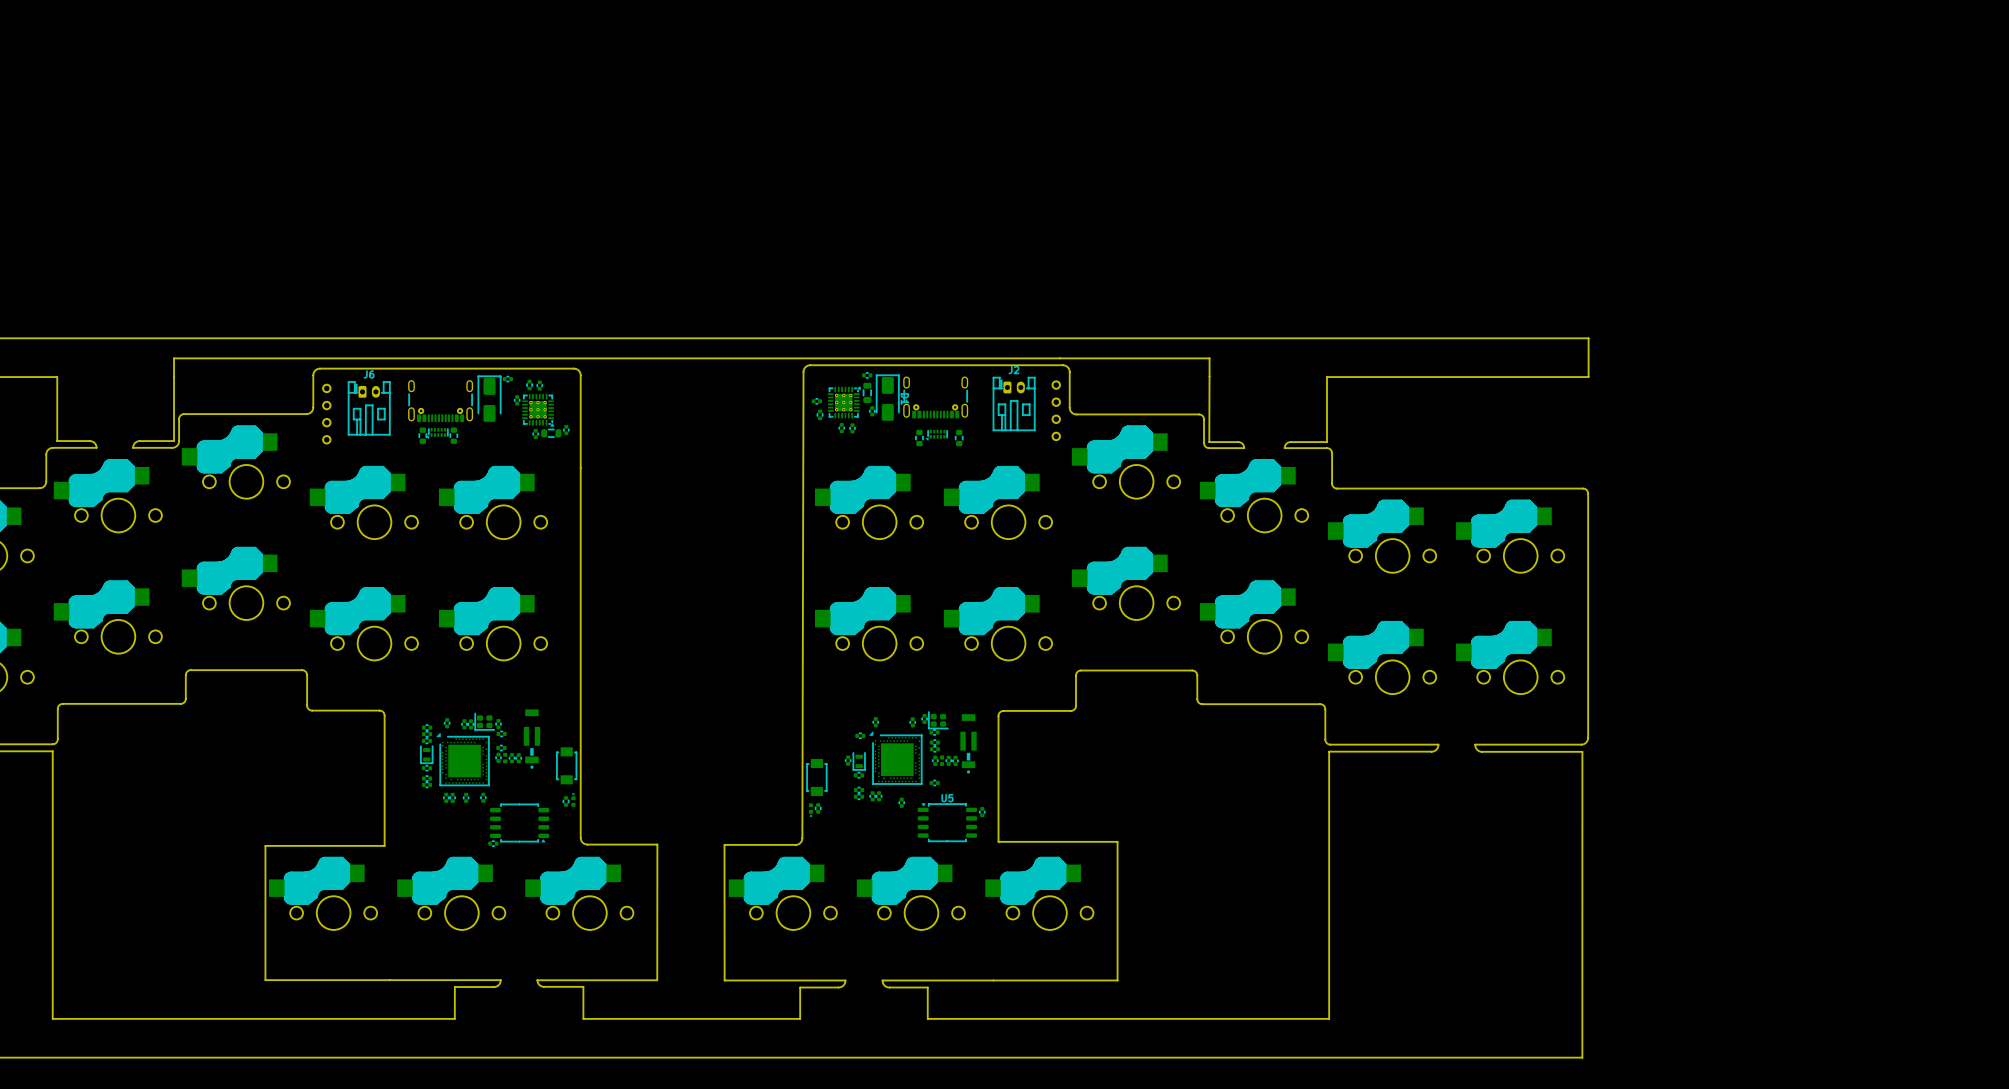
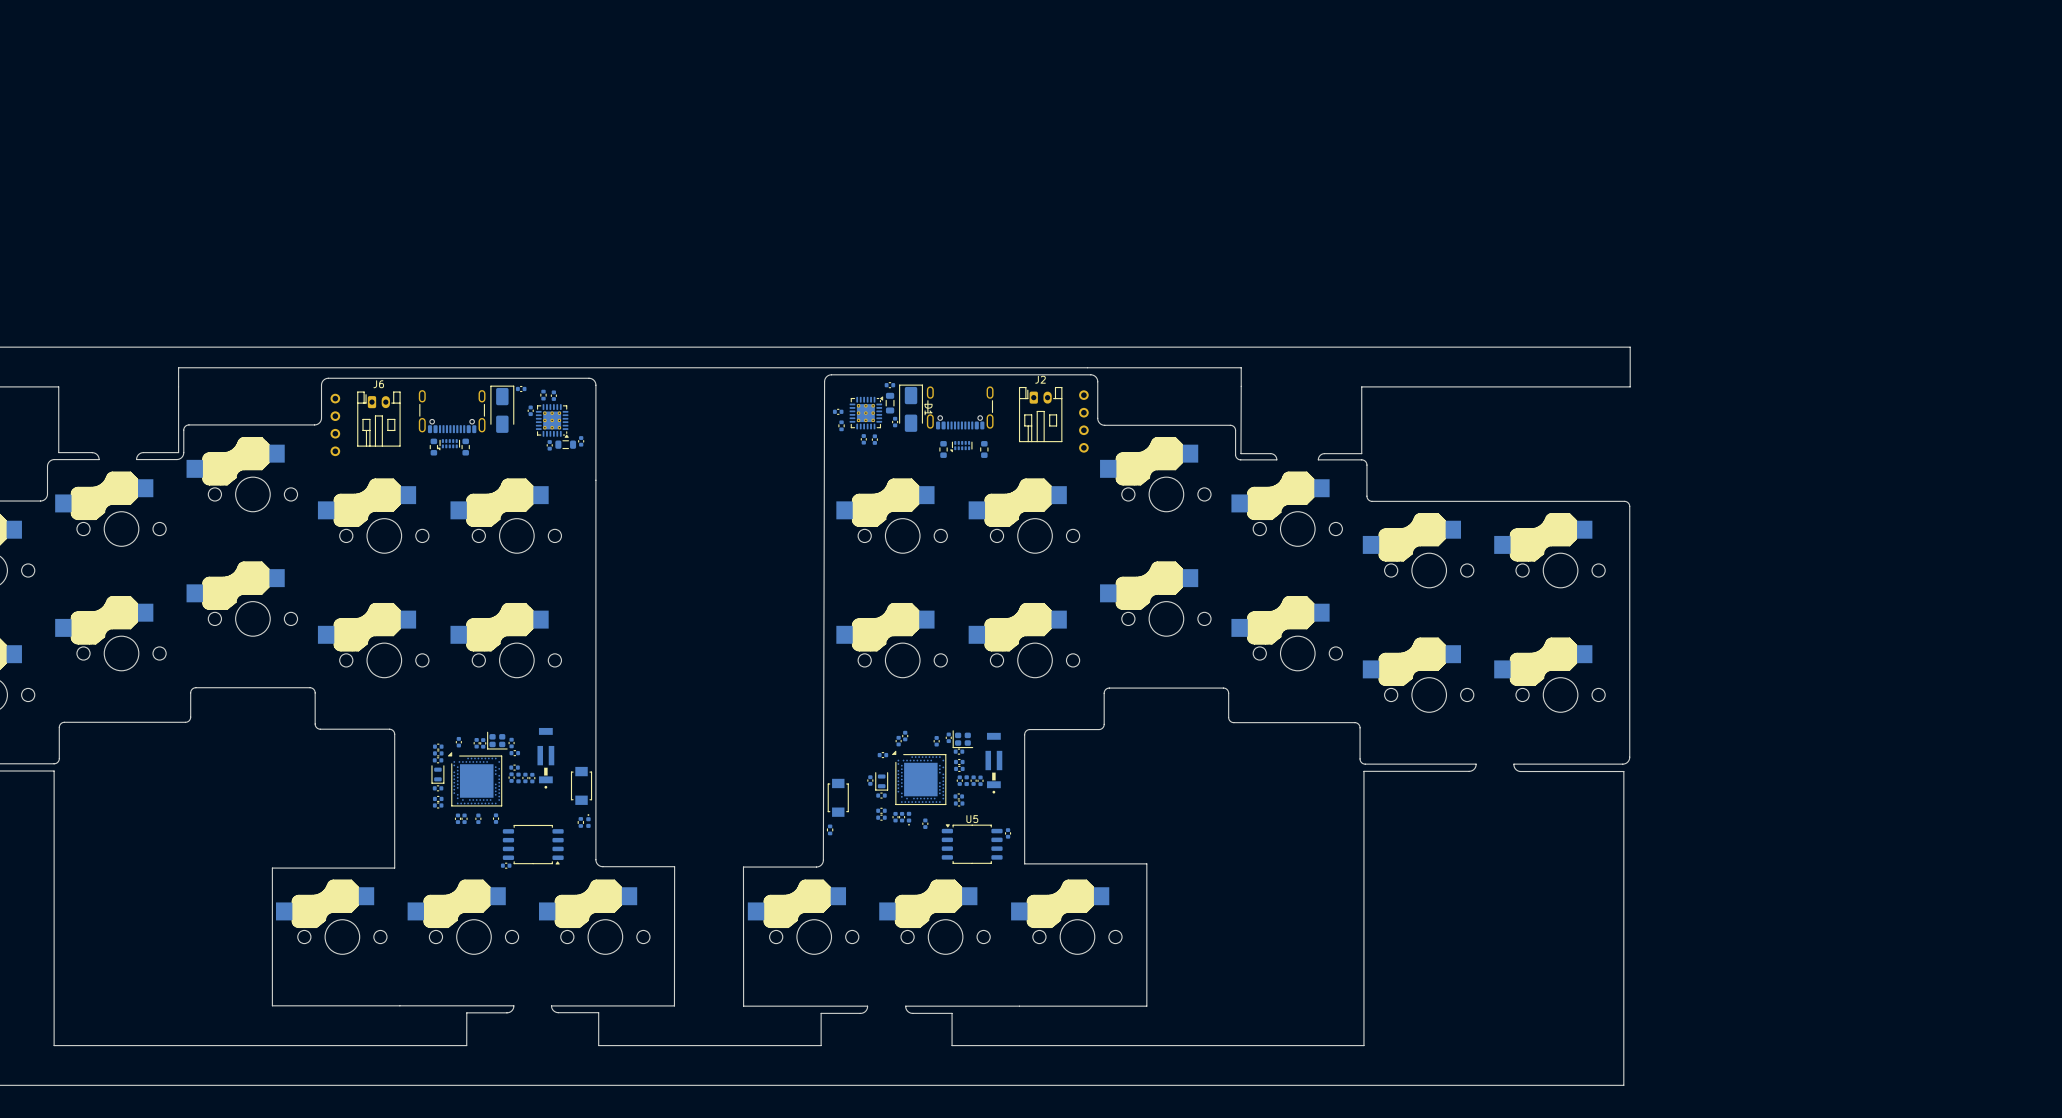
part: none -> (905, 736)
part: none -> (958, 796)
part: none -> (909, 818)
part footprint: [808, 803, 814, 817] -> [827, 824, 834, 836]
part: (818, 808) -> none

